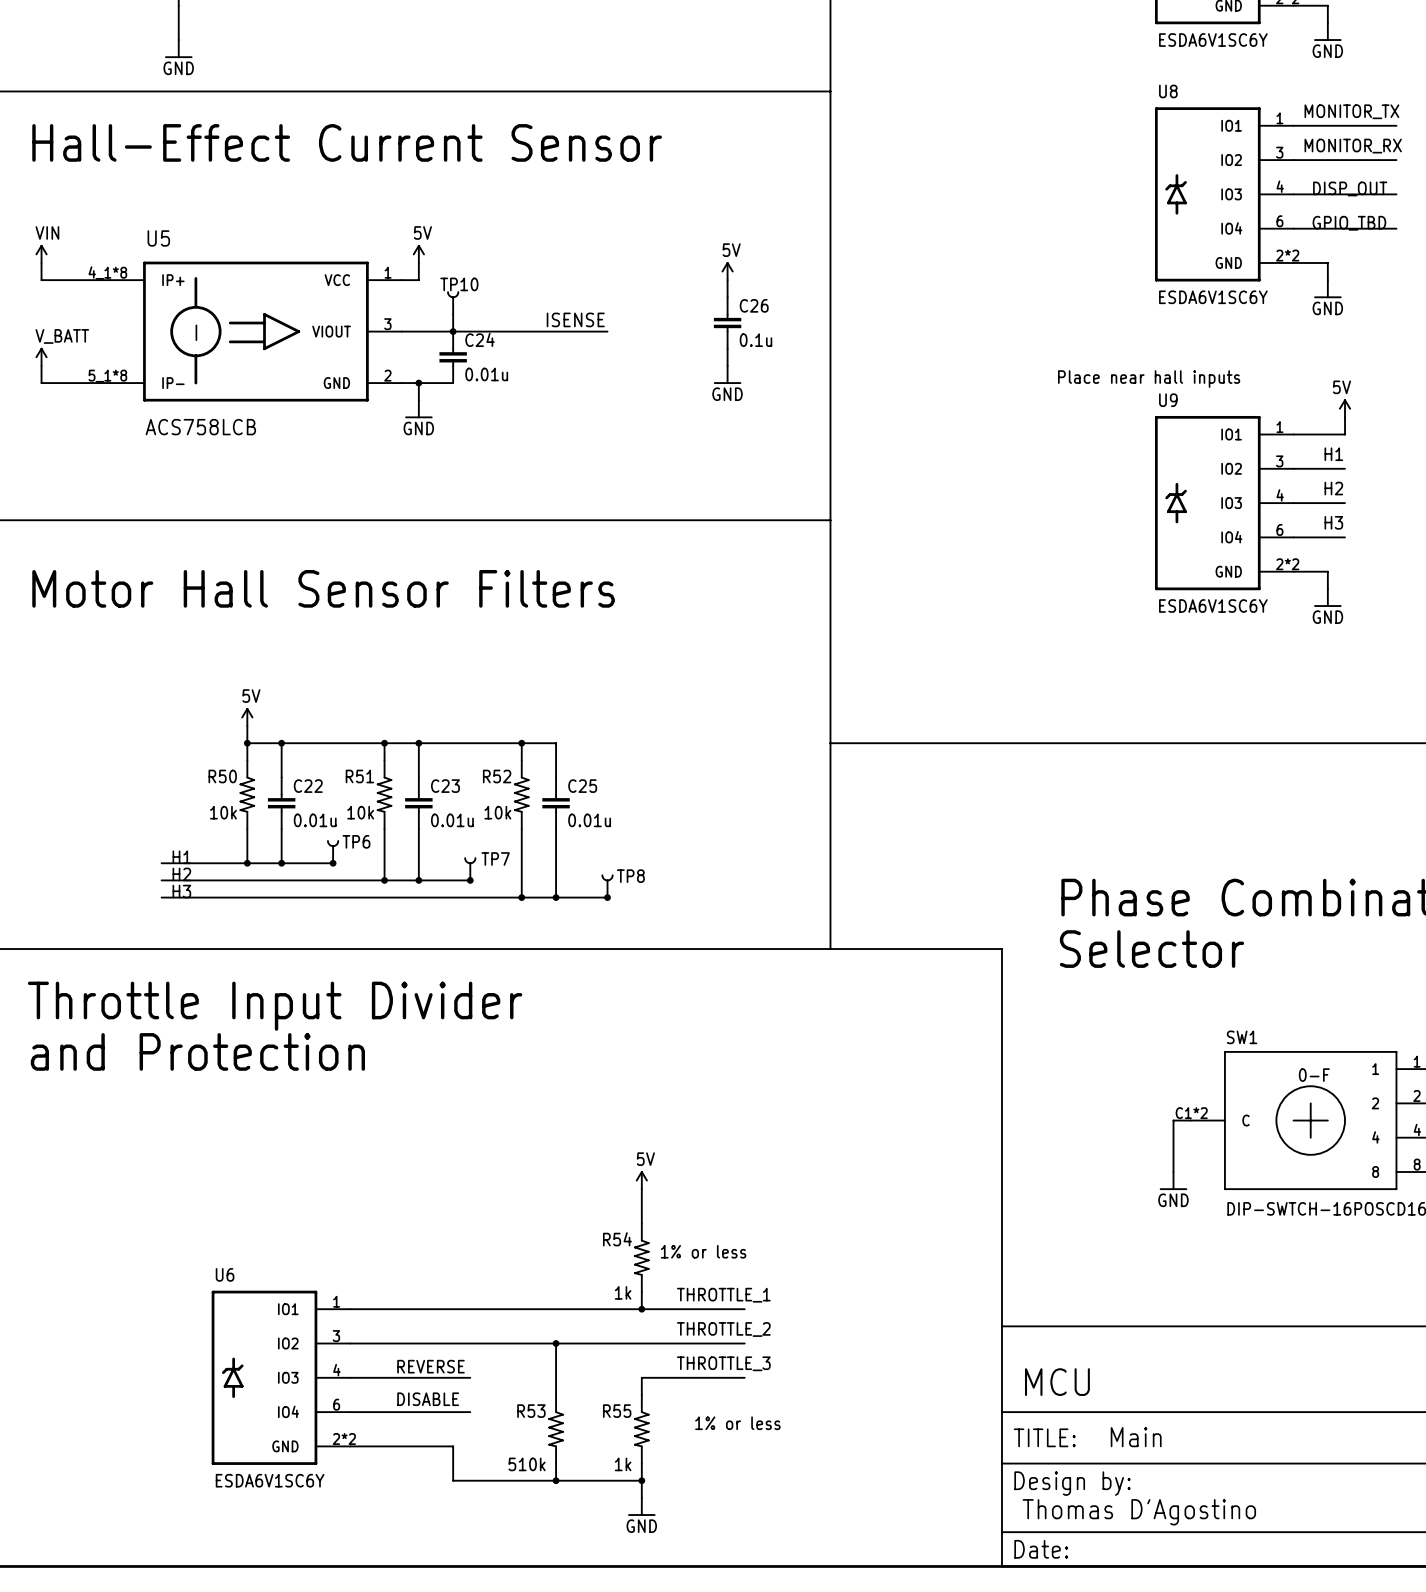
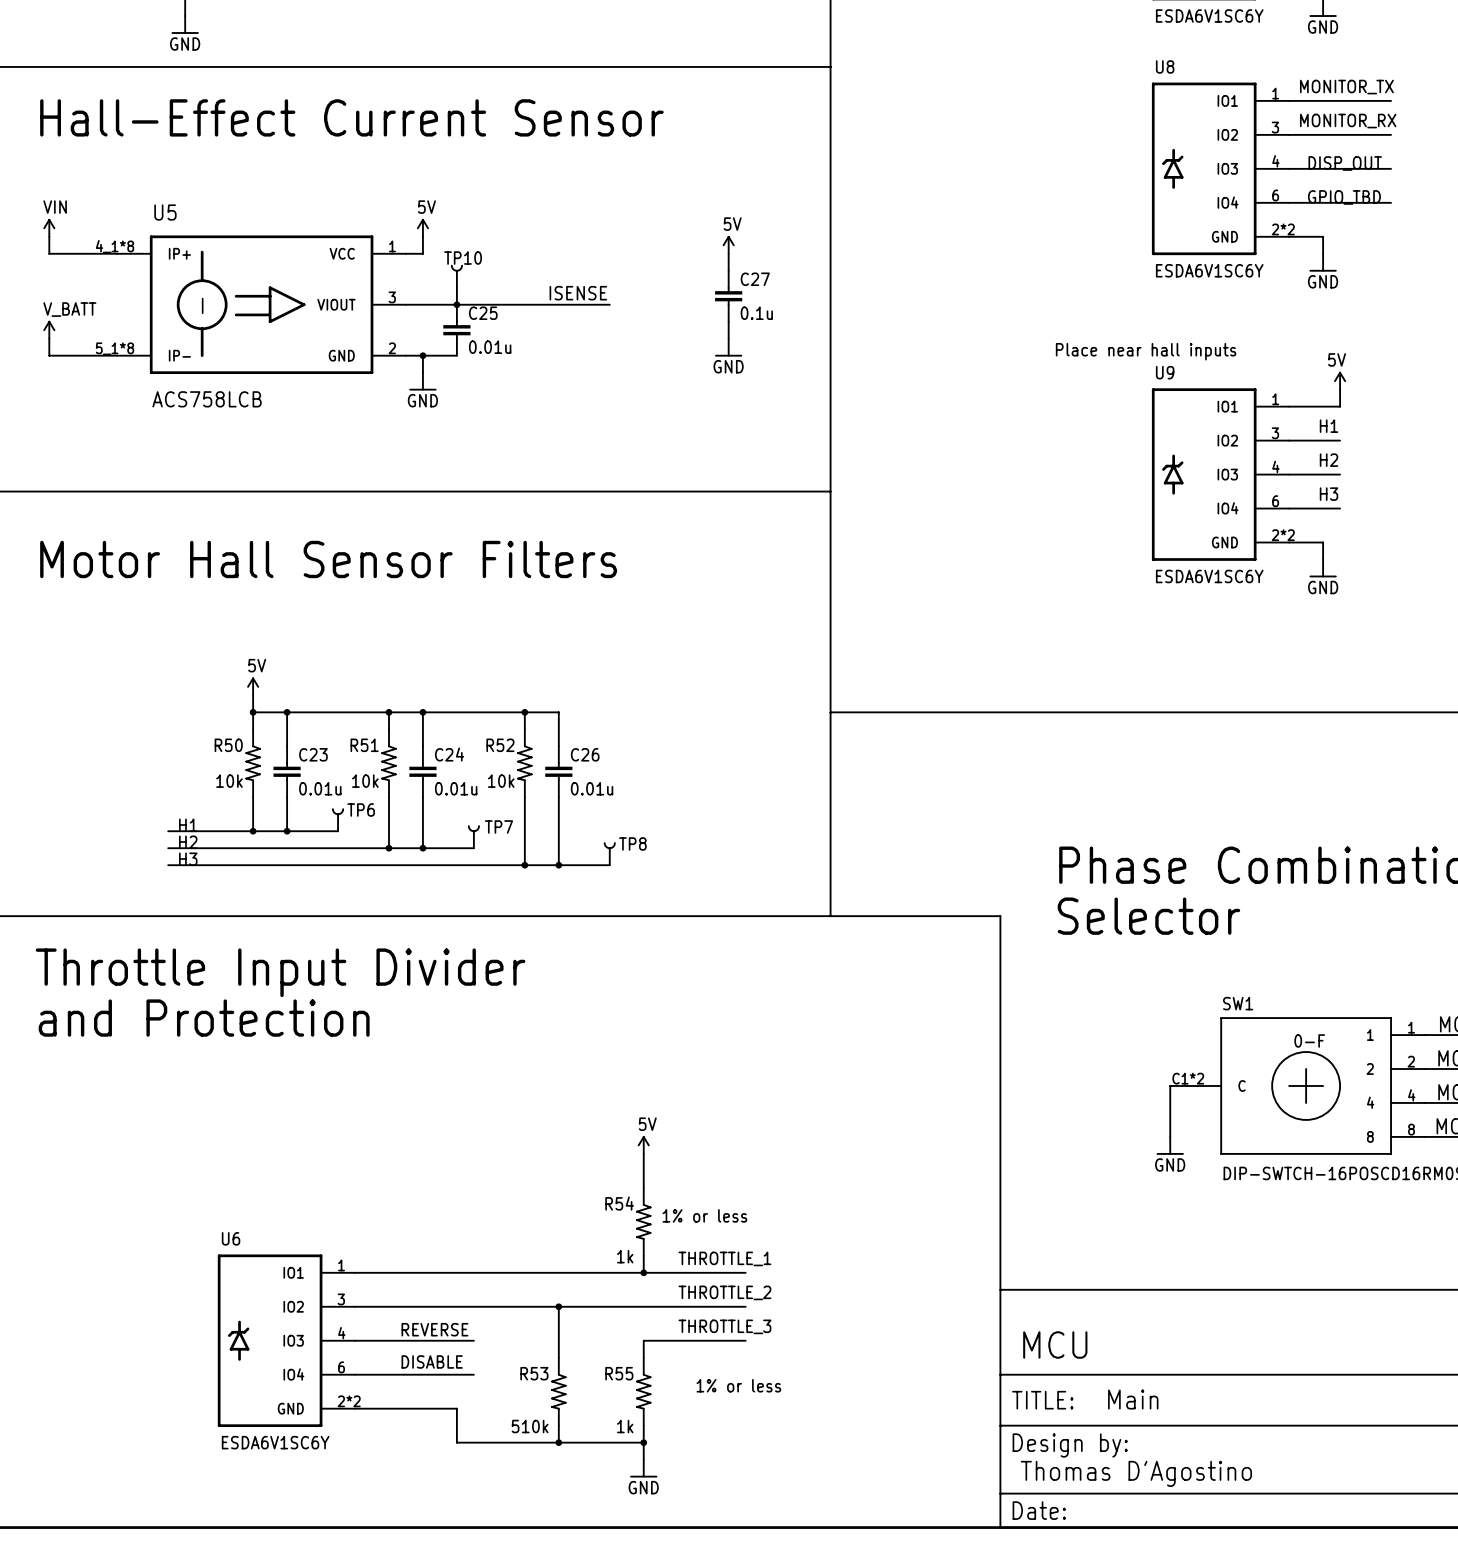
C26 name: C26 (754, 305) -> C27 (755, 279)
C24 name: C24 (480, 339) -> C25 (483, 313)
C22 name: C22 (308, 786) -> C23 (313, 754)
C23 name: C23 (445, 786) -> C24 (449, 754)
C25 name: C25 (582, 786) -> C26 (585, 754)
junction: (333, 863) -> none
junction: (470, 880) -> none
junction: (607, 897) -> none

